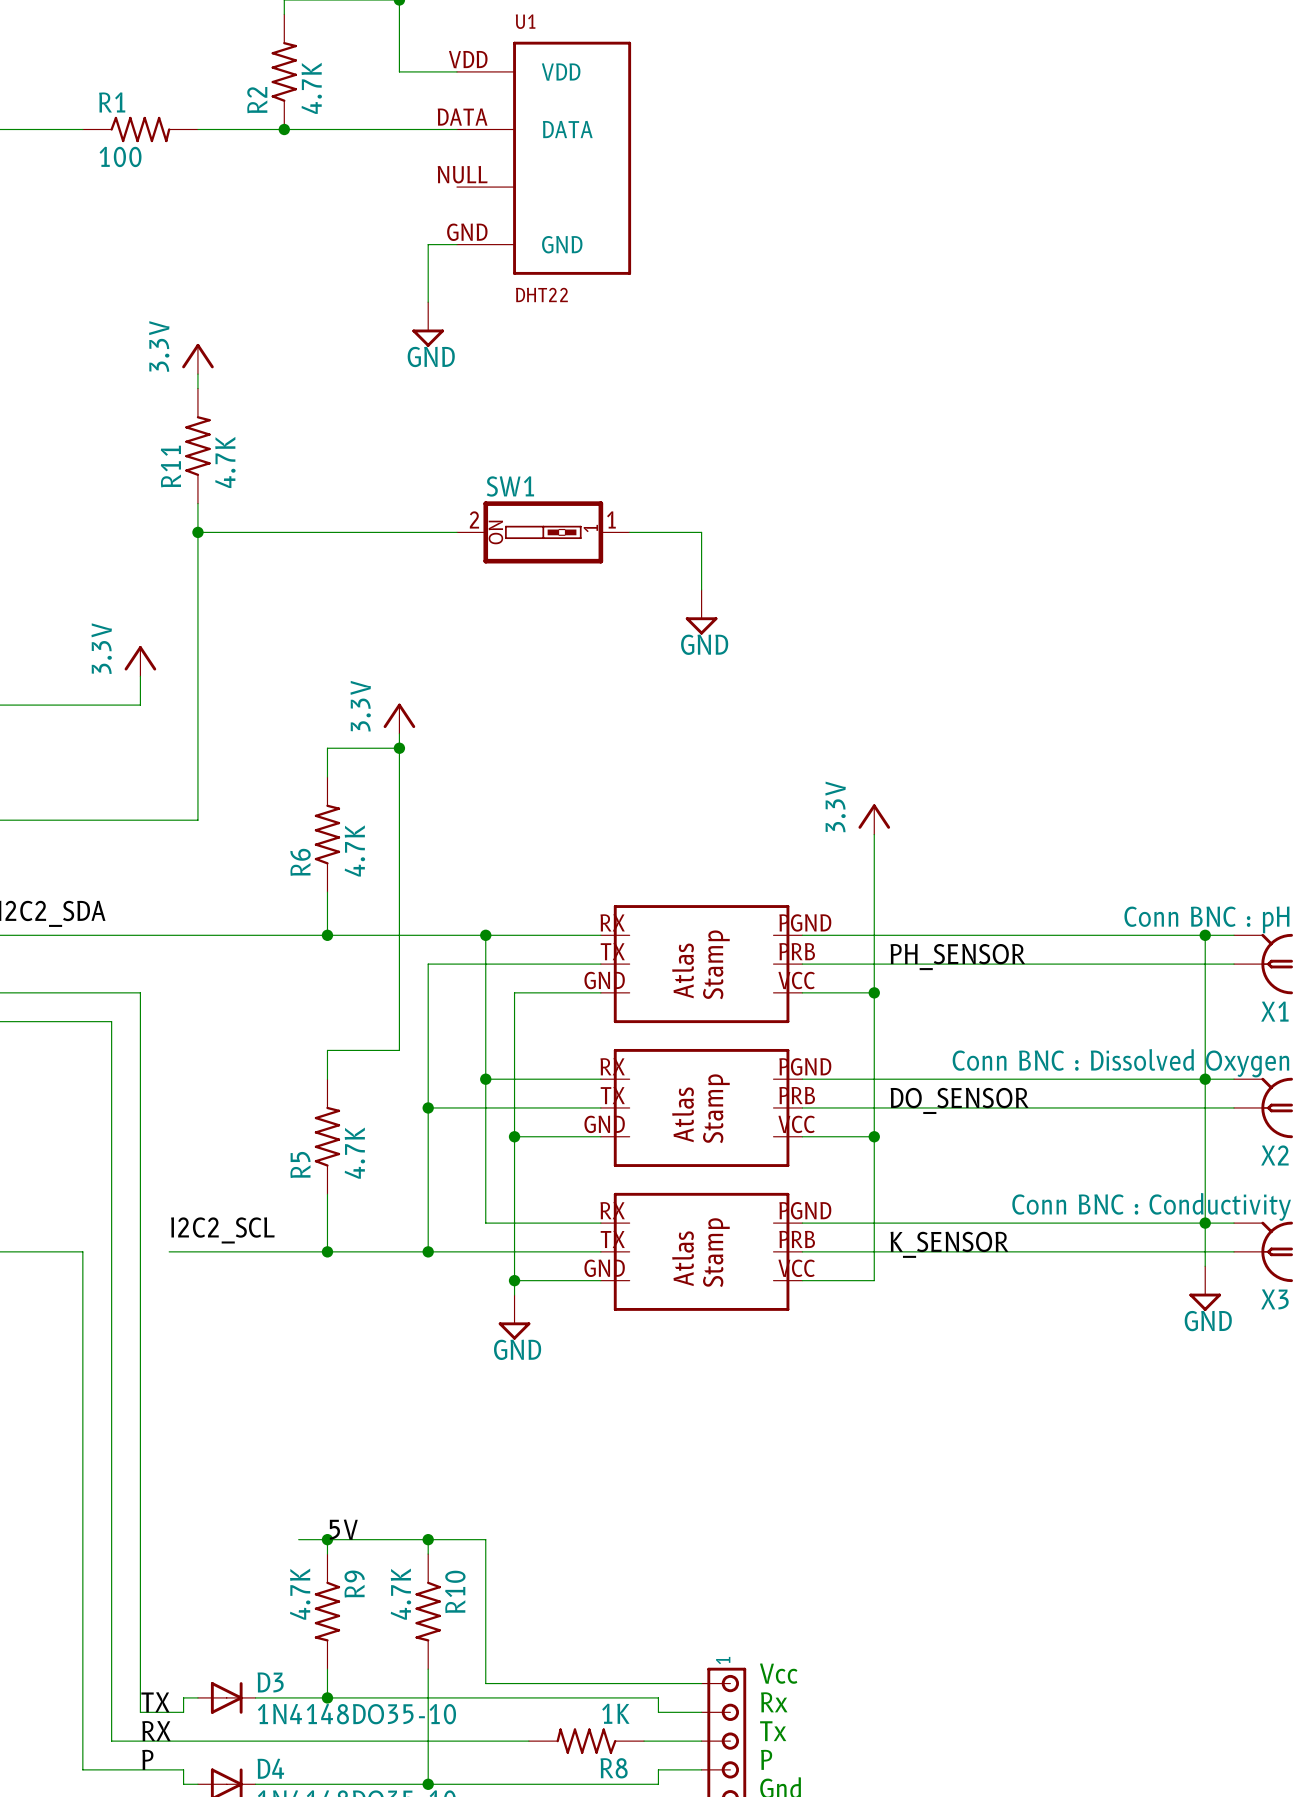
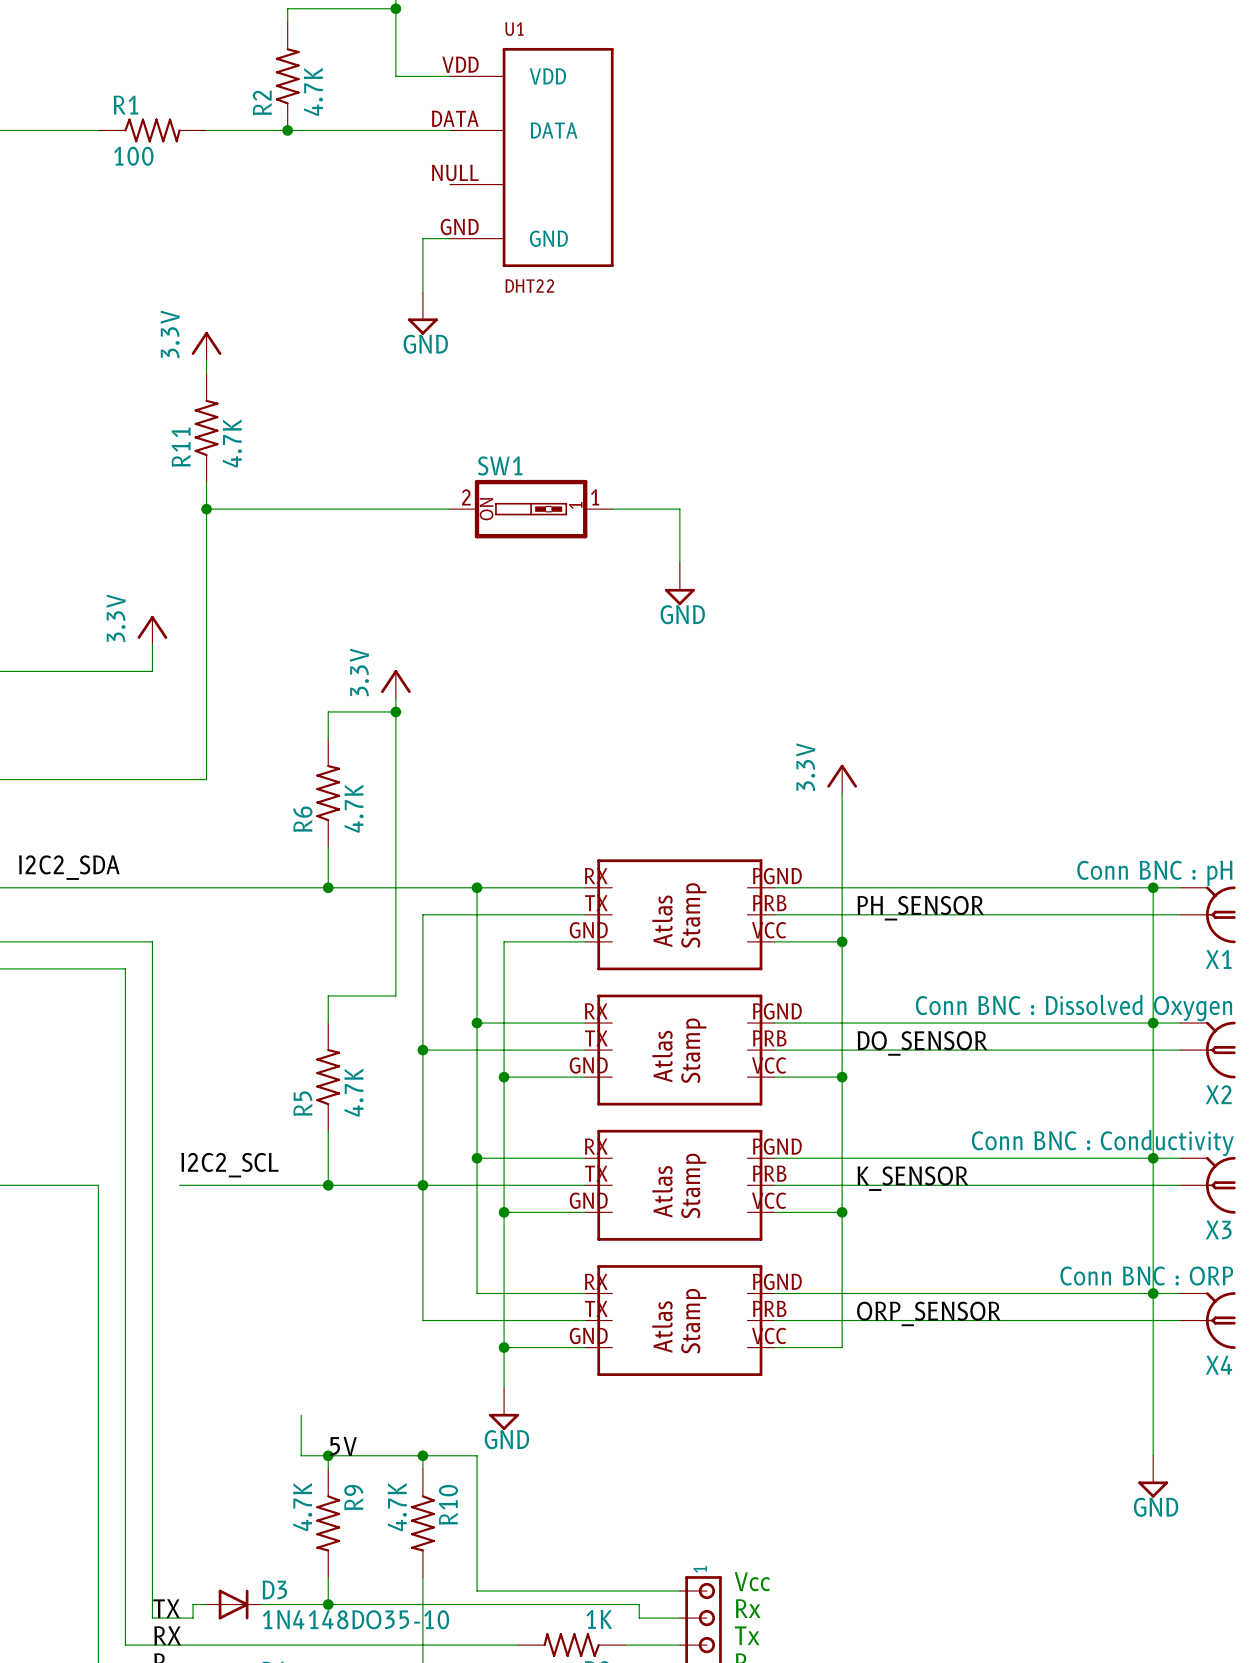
wire: none -> (477, 1158) (477, 1293) (585, 1293)
junction: none -> (477, 1158)
wire: none -> (422, 1185) (422, 1320) (585, 1320)
wire: none -> (1153, 1198) (1153, 1455)
wire: none -> (842, 1212) (842, 1347) (774, 1347)
junction: none -> (842, 1212)
power symbol position: GND (1205, 1288) -> GND (1153, 1476)
wire: none -> (504, 1225) (504, 1388)
power symbol position: GND (514, 1317) -> GND (504, 1409)
wire: none -> (774, 1293) (1180, 1293)
junction: none -> (1153, 1293)
label: none -> ORP_SENSOR (928, 1313)
part: none -> (679, 1320)
wire: none -> (774, 1320) (1180, 1320)
X4: none -> Conn BNC : ORP (1207, 1320)
wire: none -> (504, 1347) (585, 1347)
junction: none -> (504, 1347)
wire: none -> (301, 1415) (301, 1455)

